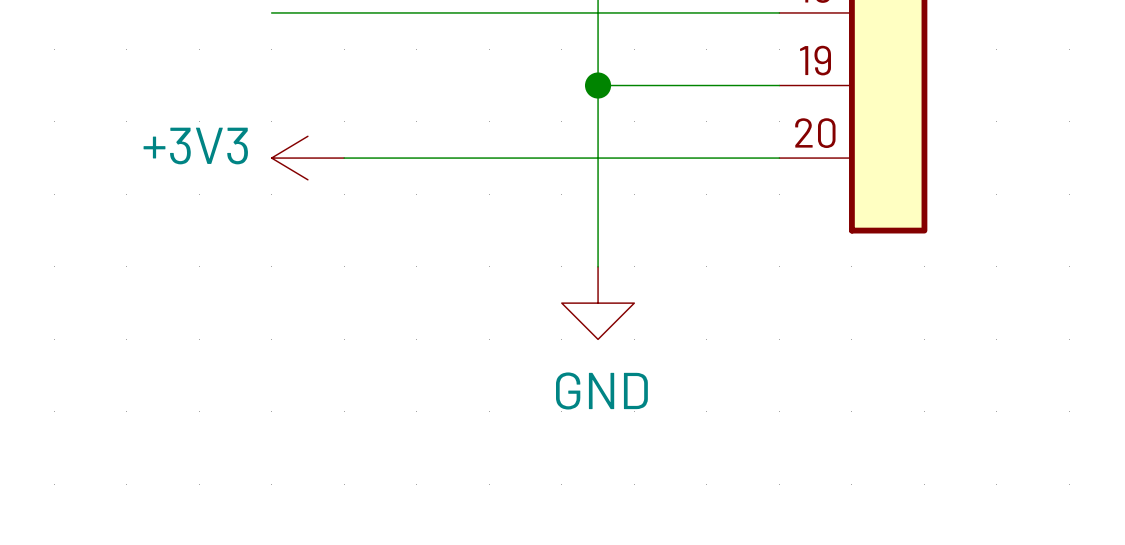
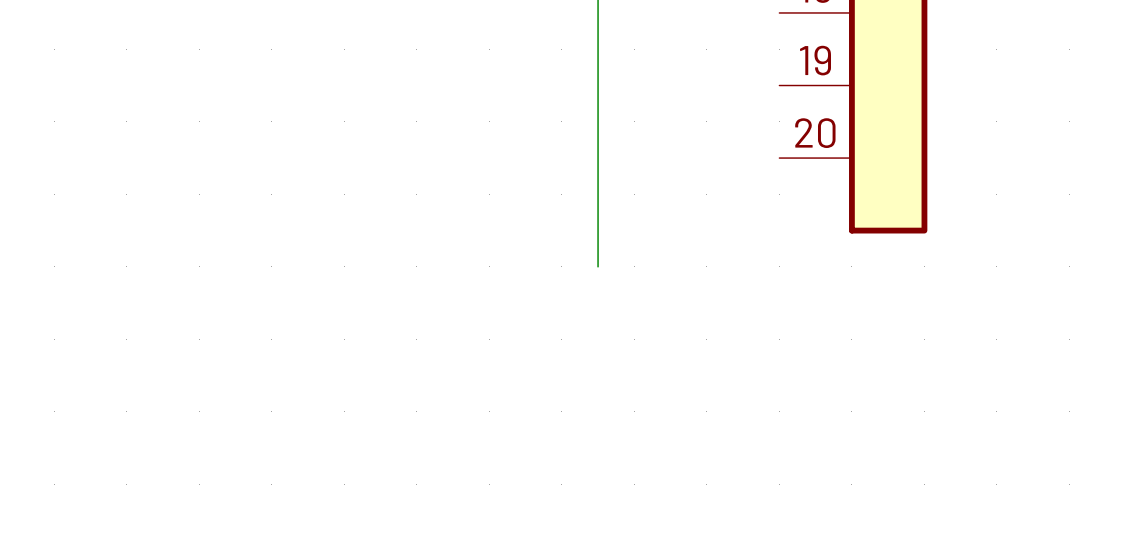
wire: (271, 12) (779, 12) -> none
wire: (598, 85) (779, 85) -> none
junction: (598, 85) -> none
power symbol: +3V3 (307, 158) -> none
wire: (344, 158) (779, 158) -> none
power symbol: GND (598, 303) -> none

